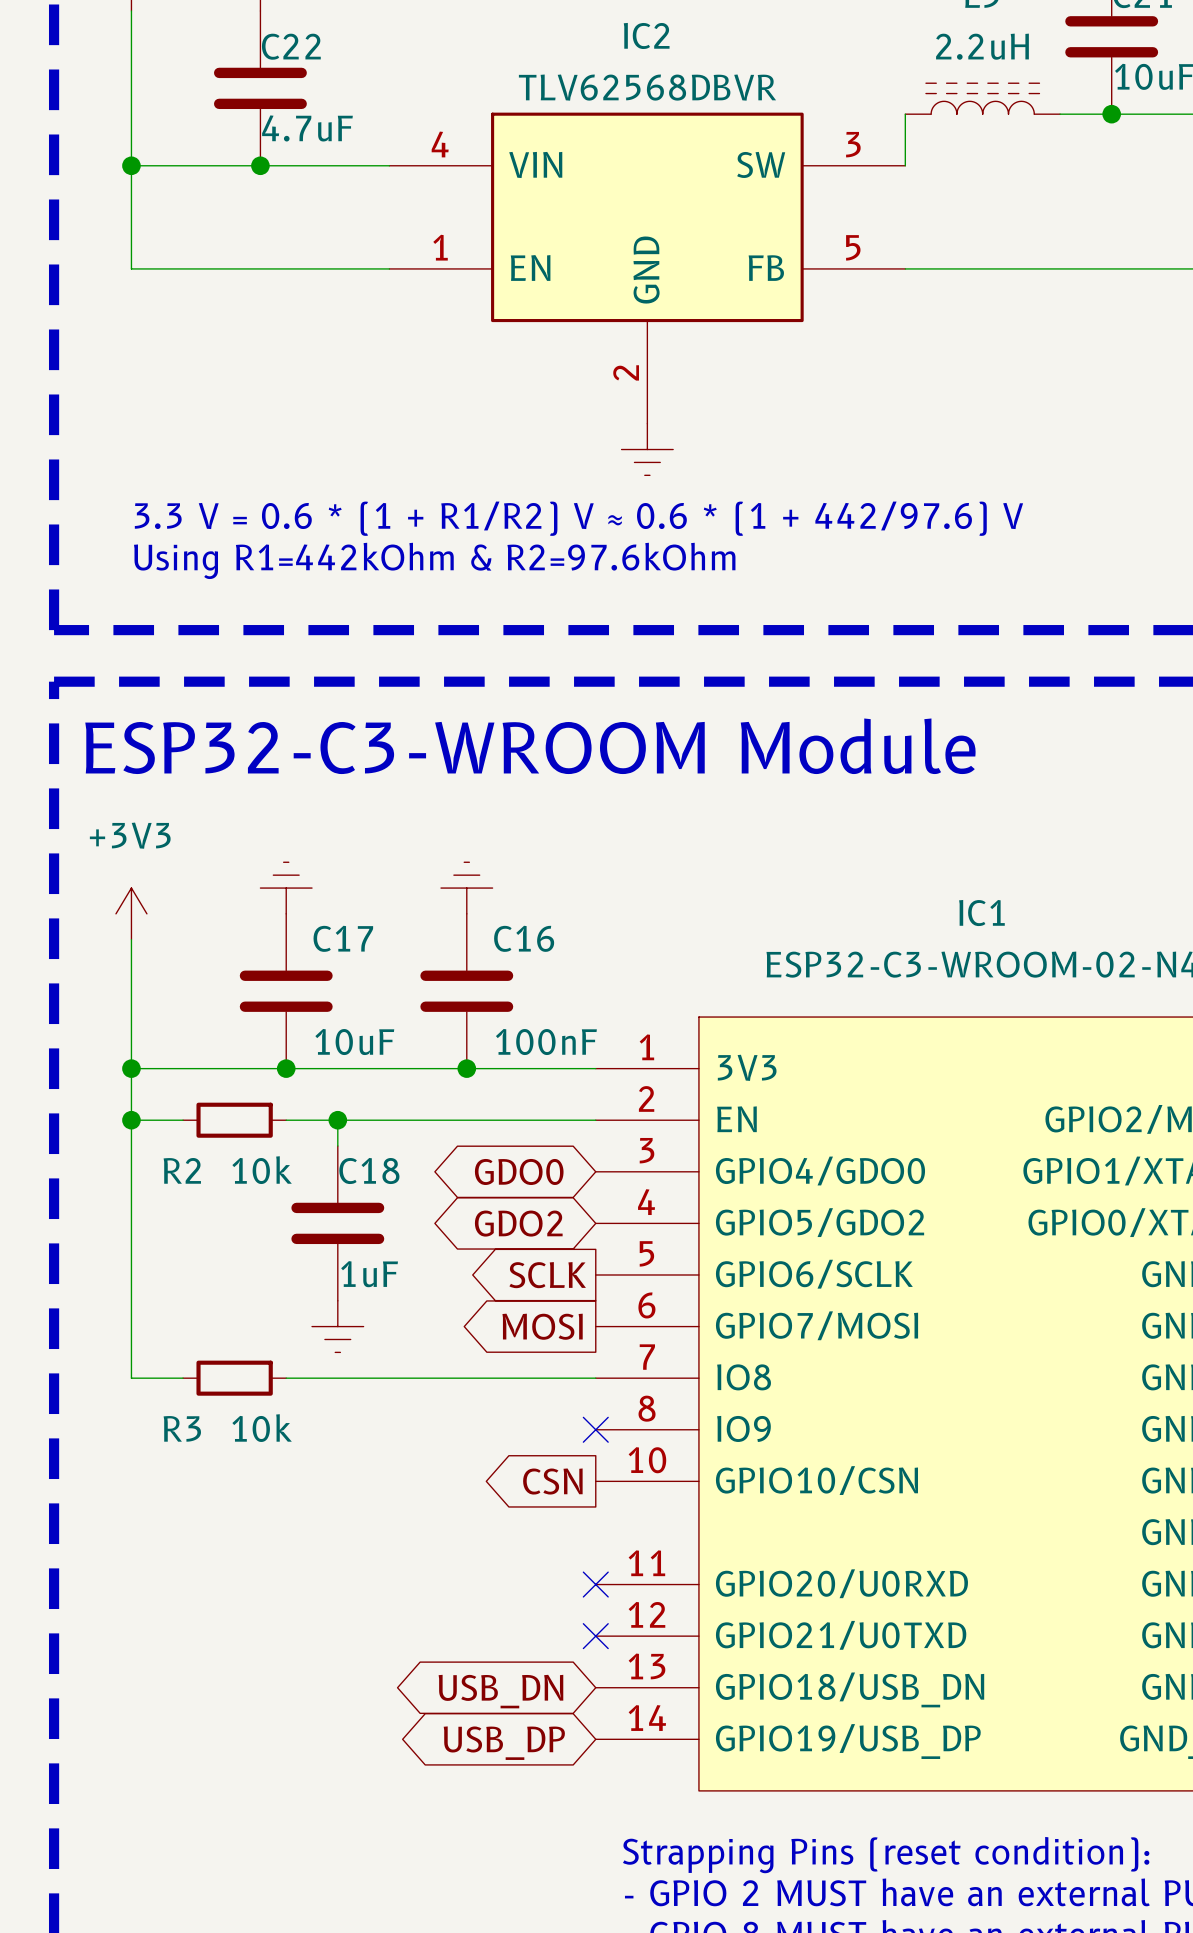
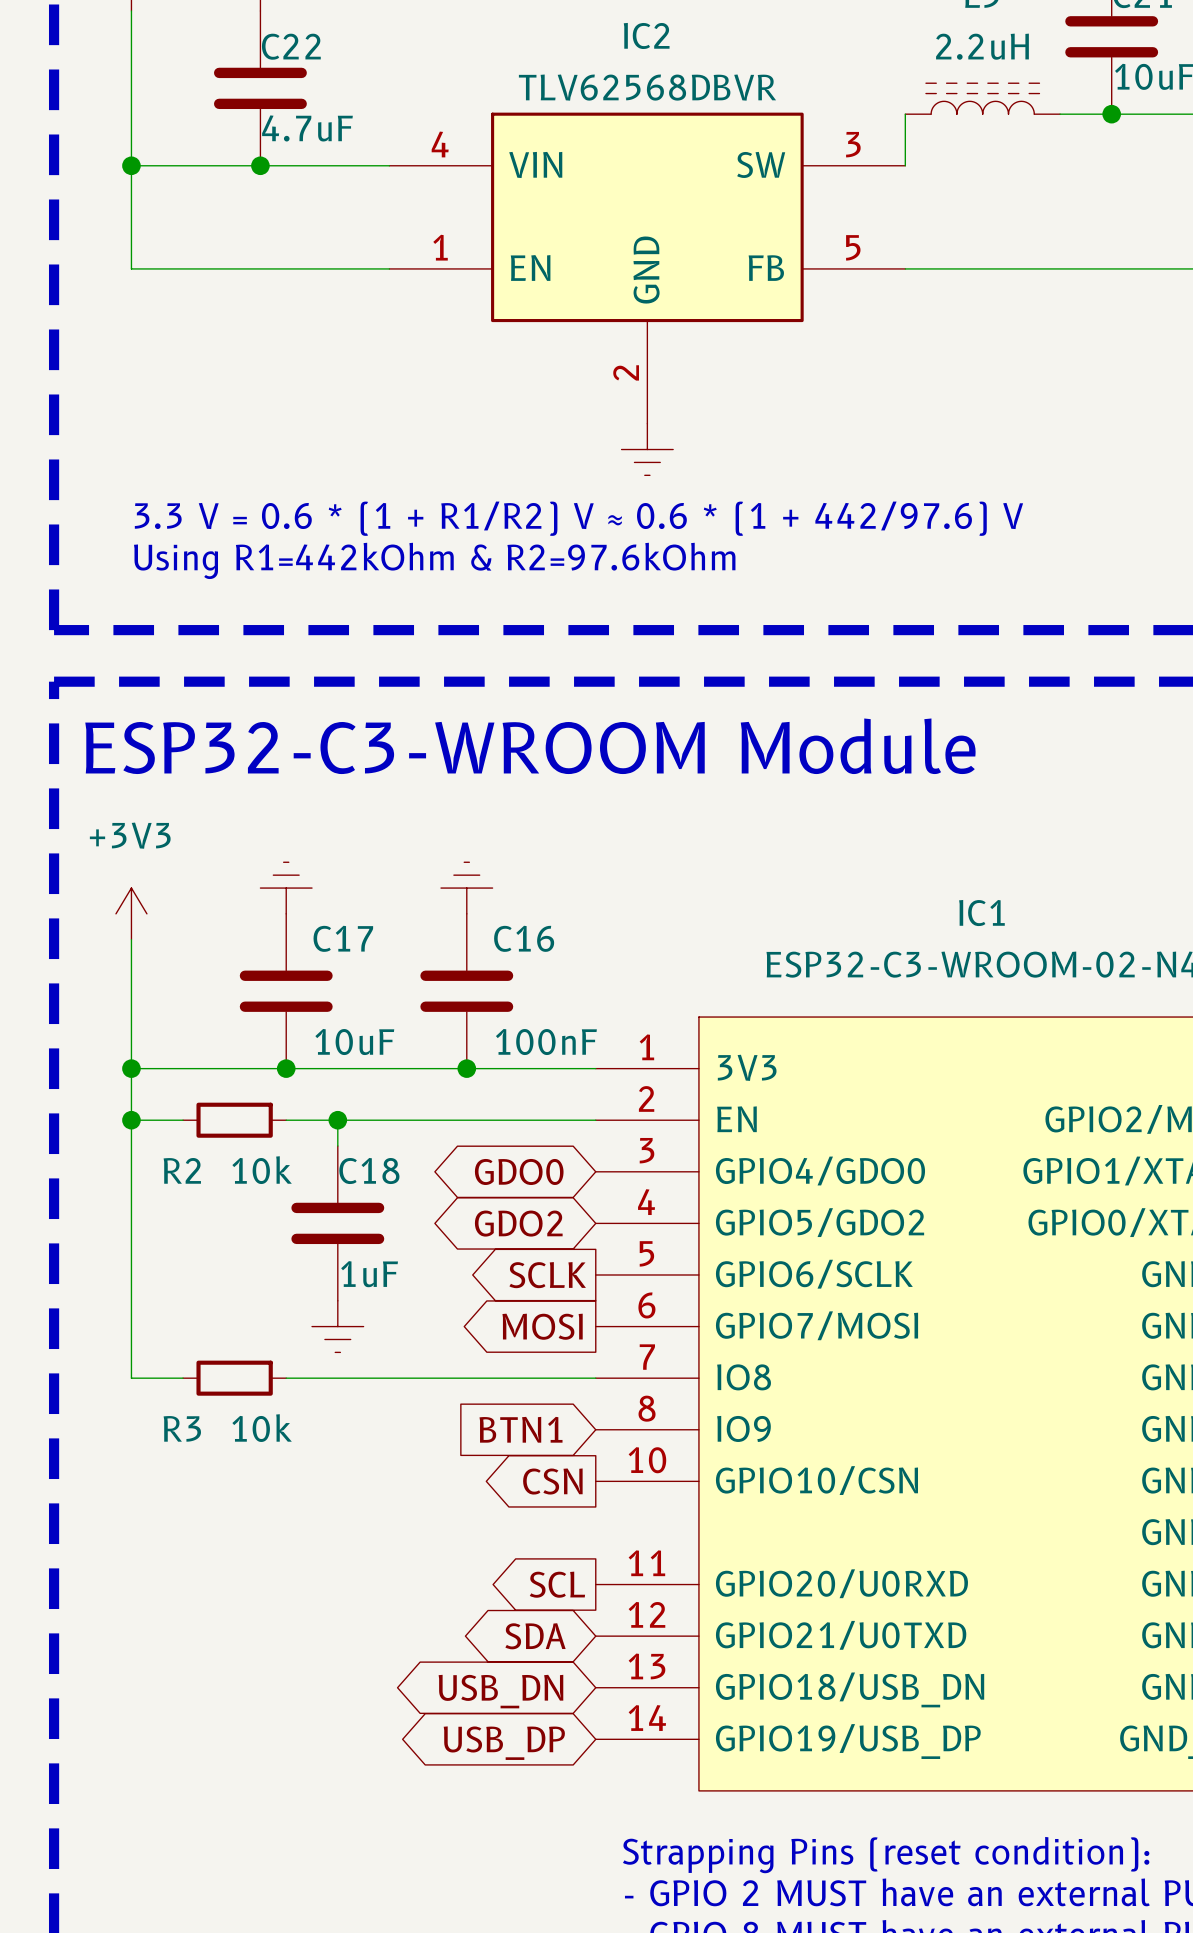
global label: none -> BTN1 (521, 1429)
no-connect mark: (595, 1429) -> none
global label: none -> SCL (557, 1584)
no-connect mark: (595, 1584) -> none
global label: none -> SDA (535, 1636)
no-connect mark: (595, 1636) -> none

